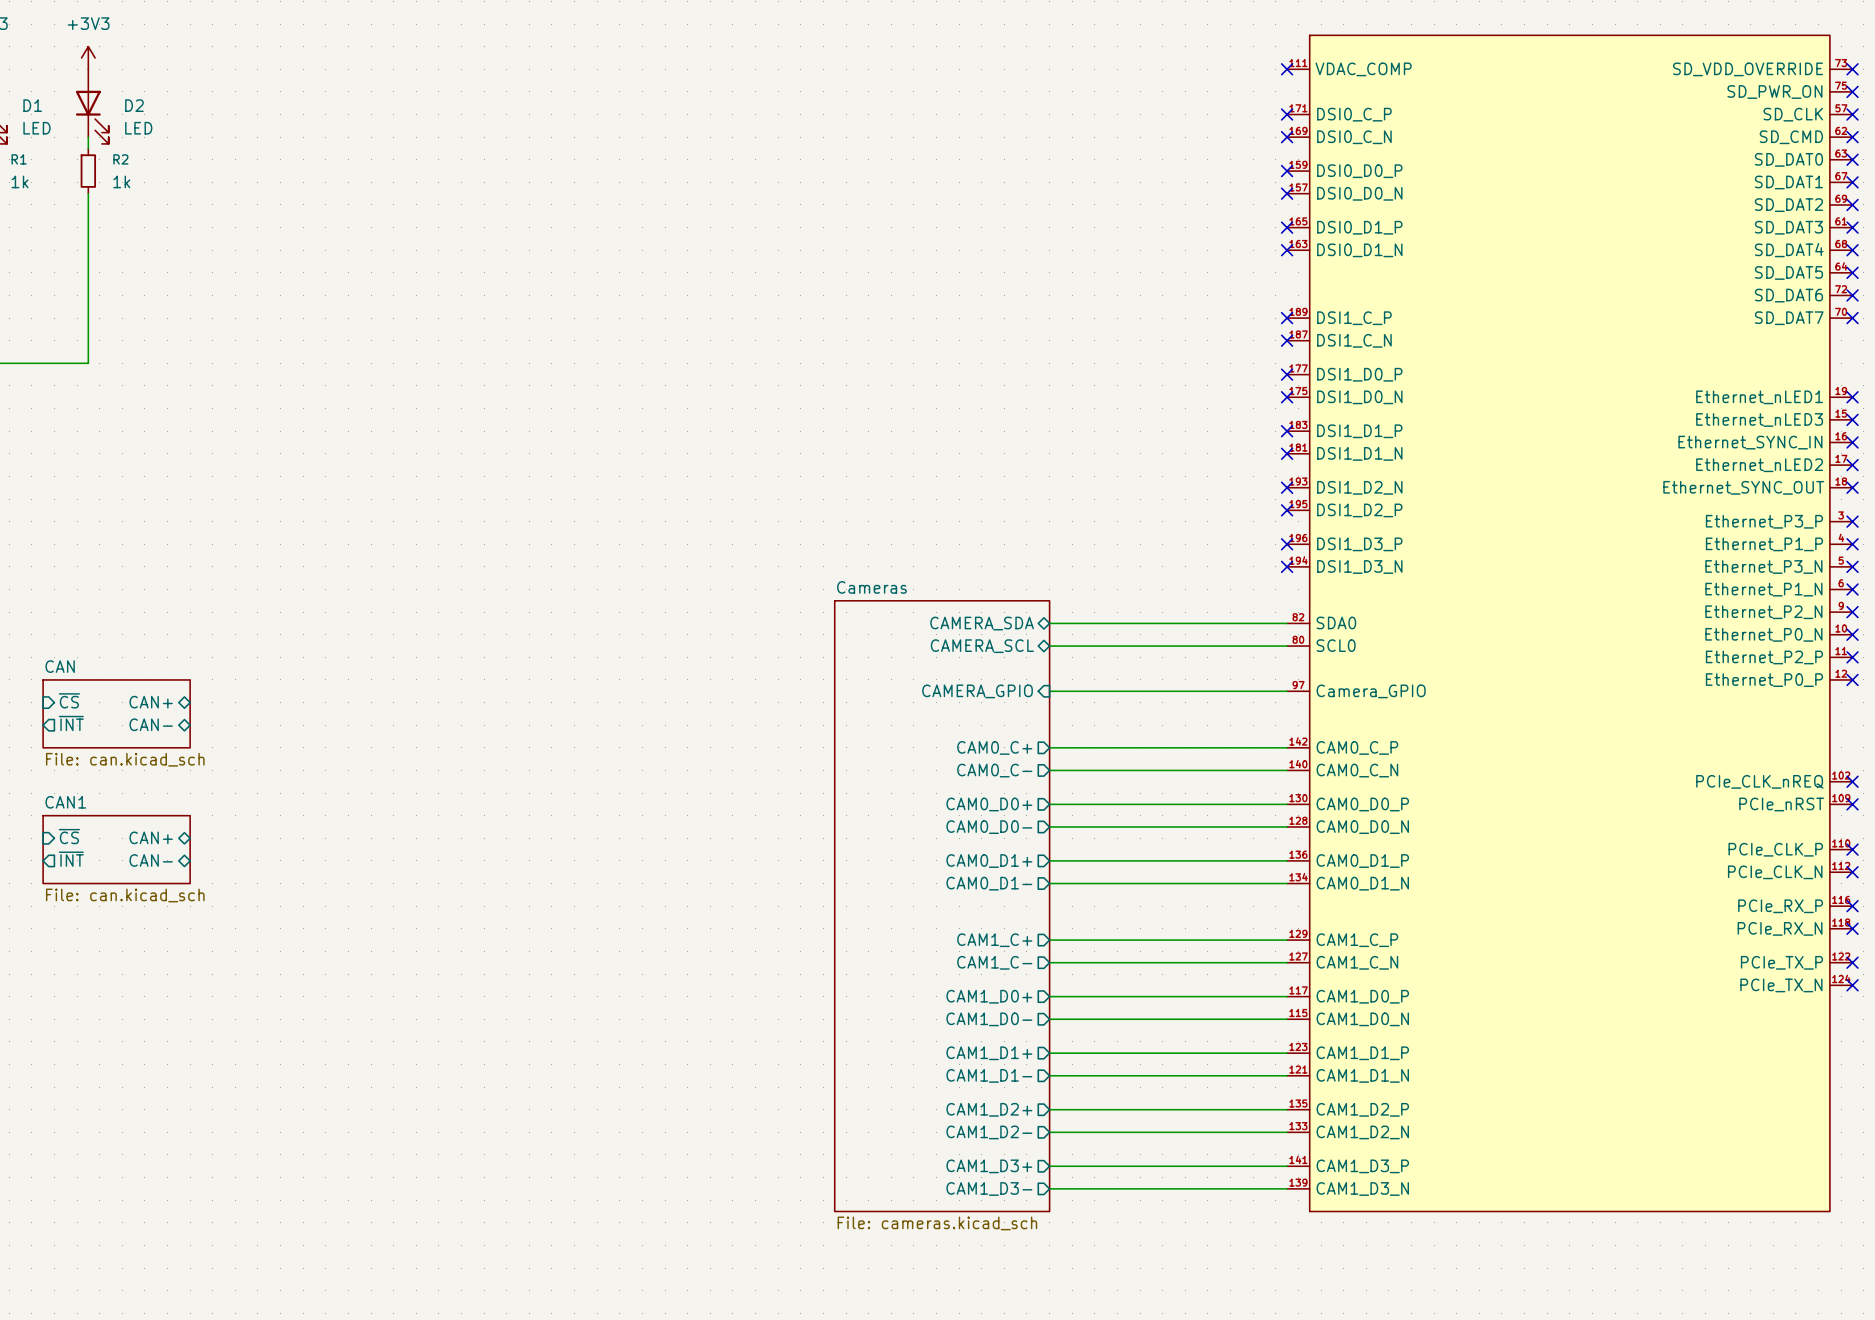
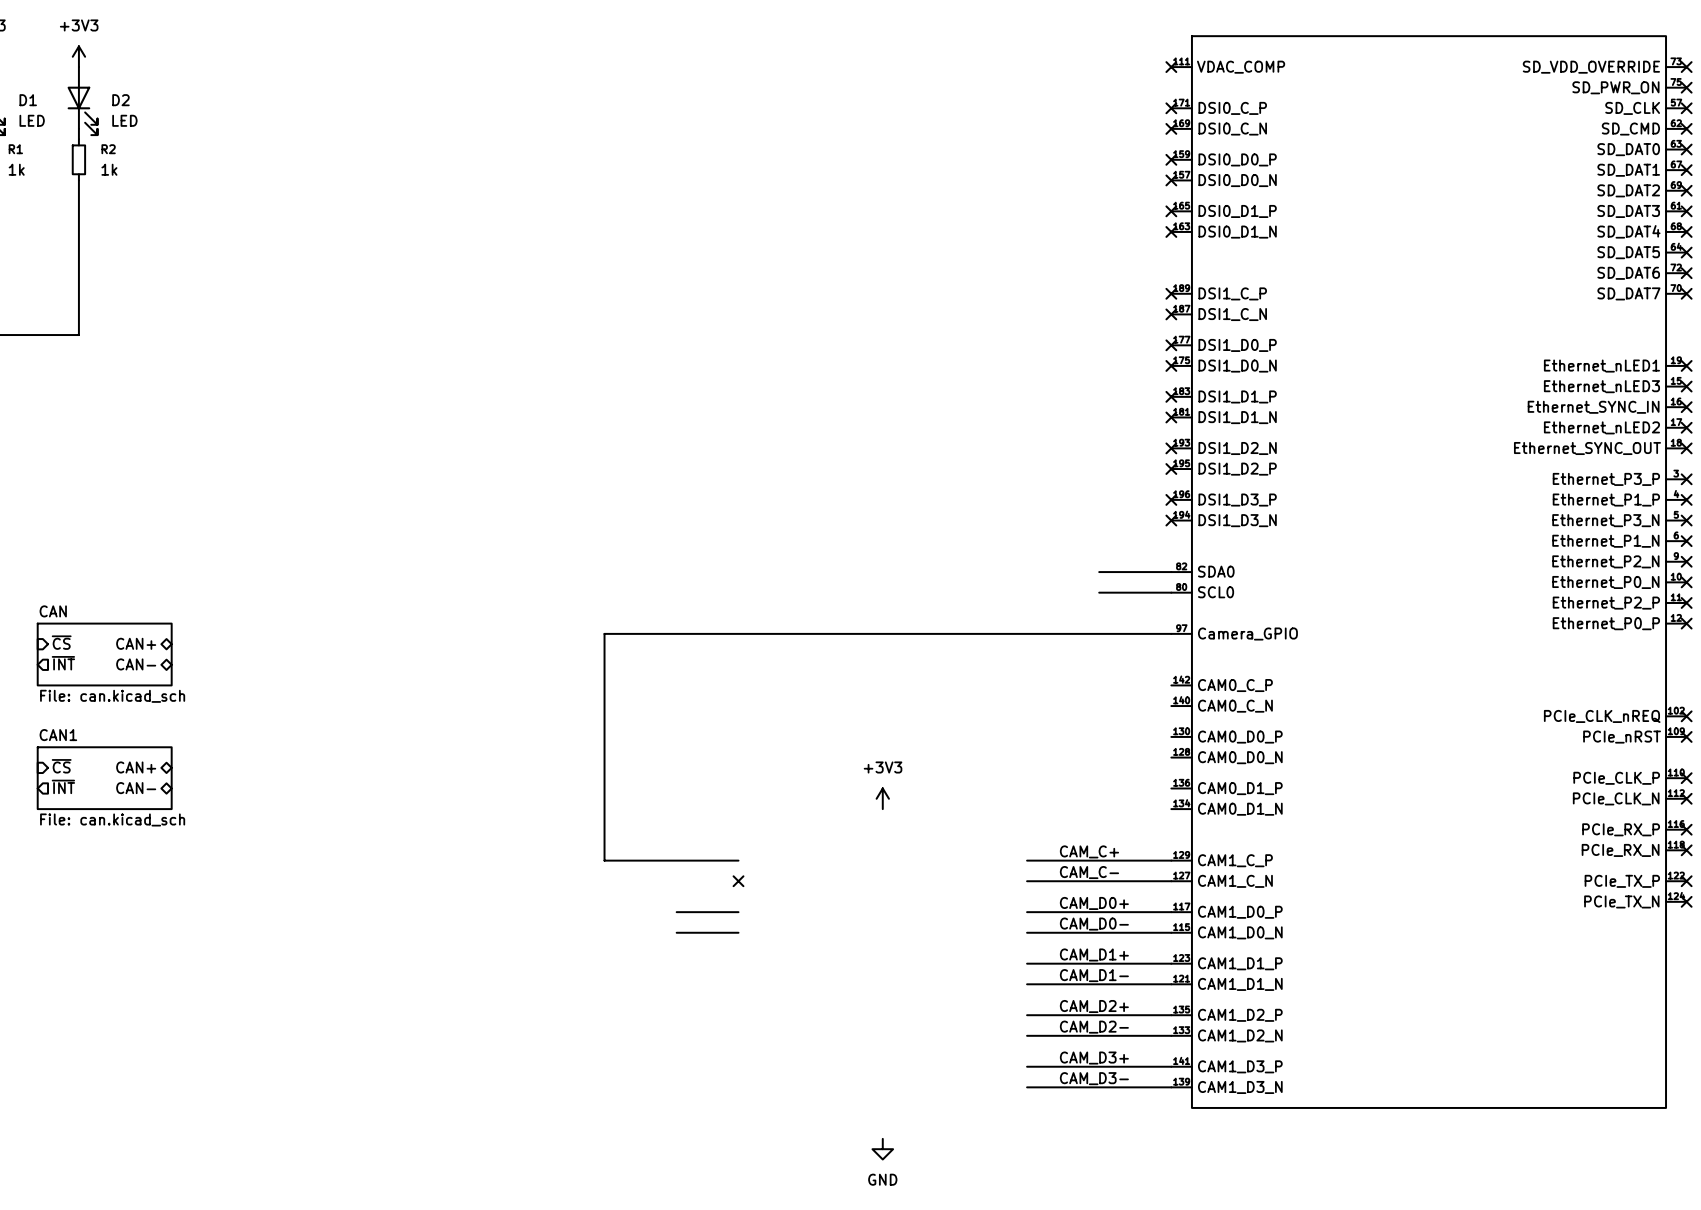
sheet pin: CAMERA_SDA (982, 623) -> none
wire: (1049, 623) (1207, 623) -> none
sheet pin: CAMERA_SCL (982, 646) -> none
wire: (1049, 646) (1207, 646) -> none
sheet pin: CAMERA_GPIO (977, 691) -> none
wire: none -> (954, 633) (604, 633) (604, 860) (738, 860)
sheet pin: CAM0_C+ (994, 747) -> none
wire: (1049, 747) (1287, 747) -> none
sheet pin: CAM0_C- (994, 770) -> none
wire: (1049, 770) (1287, 770) -> none
sheet pin: CAM0_D0+ (989, 804) -> none
wire: (1049, 804) (1287, 804) -> none
wire: (1049, 826) (1287, 826) -> none
sheet pin: CAM0_D0- (989, 827) -> none
wire: (1049, 860) (1287, 860) -> none
sheet pin: CAM0_D1+ (989, 861) -> none
power symbol: none -> +3V3 (882, 798)
sheet pin: CAM0_D1- (989, 883) -> none
wire: (1049, 883) (1287, 883) -> none
sheet Cameras: File: cameras.kicad_sch (942, 906) -> none
label: none -> CAM_C+ (1089, 851)
sheet pin: CAM1_C+ (994, 940) -> none
wire: (1049, 940) (1128, 940) -> none
label: none -> CAM_C- (1089, 872)
no-connect mark: none -> (738, 881)
sheet pin: CAM1_C- (994, 962) -> none
wire: (1049, 962) (1128, 962) -> none
label: none -> CAM_D0+ (1094, 903)
wire: none -> (676, 912) (738, 912)
sheet pin: CAM1_D0+ (989, 996) -> none
wire: (1049, 996) (1128, 996) -> none
label: none -> CAM_D0- (1094, 924)
wire: none -> (676, 932) (738, 932)
sheet pin: CAM1_D0- (989, 1019) -> none
wire: (1049, 1019) (1128, 1019) -> none
label: none -> CAM_D1+ (1094, 954)
sheet pin: CAM1_D1+ (989, 1053) -> none
wire: (1049, 1053) (1128, 1053) -> none
label: none -> CAM_D1- (1094, 975)
sheet pin: CAM1_D1- (989, 1075) -> none
wire: (1049, 1075) (1128, 1075) -> none
label: none -> CAM_D2+ (1094, 1006)
sheet pin: CAM1_D2+ (989, 1109) -> none
wire: (1049, 1109) (1128, 1109) -> none
label: none -> CAM_D2- (1094, 1027)
sheet pin: CAM1_D2- (989, 1132) -> none
wire: (1049, 1132) (1128, 1132) -> none
label: none -> CAM_D3+ (1094, 1058)
sheet pin: CAM1_D3+ (989, 1166) -> none
wire: (1049, 1166) (1128, 1166) -> none
label: none -> CAM_D3- (1094, 1078)
sheet pin: CAM1_D3- (989, 1188) -> none
wire: (1049, 1188) (1128, 1188) -> none
power symbol: none -> GND (882, 1149)

